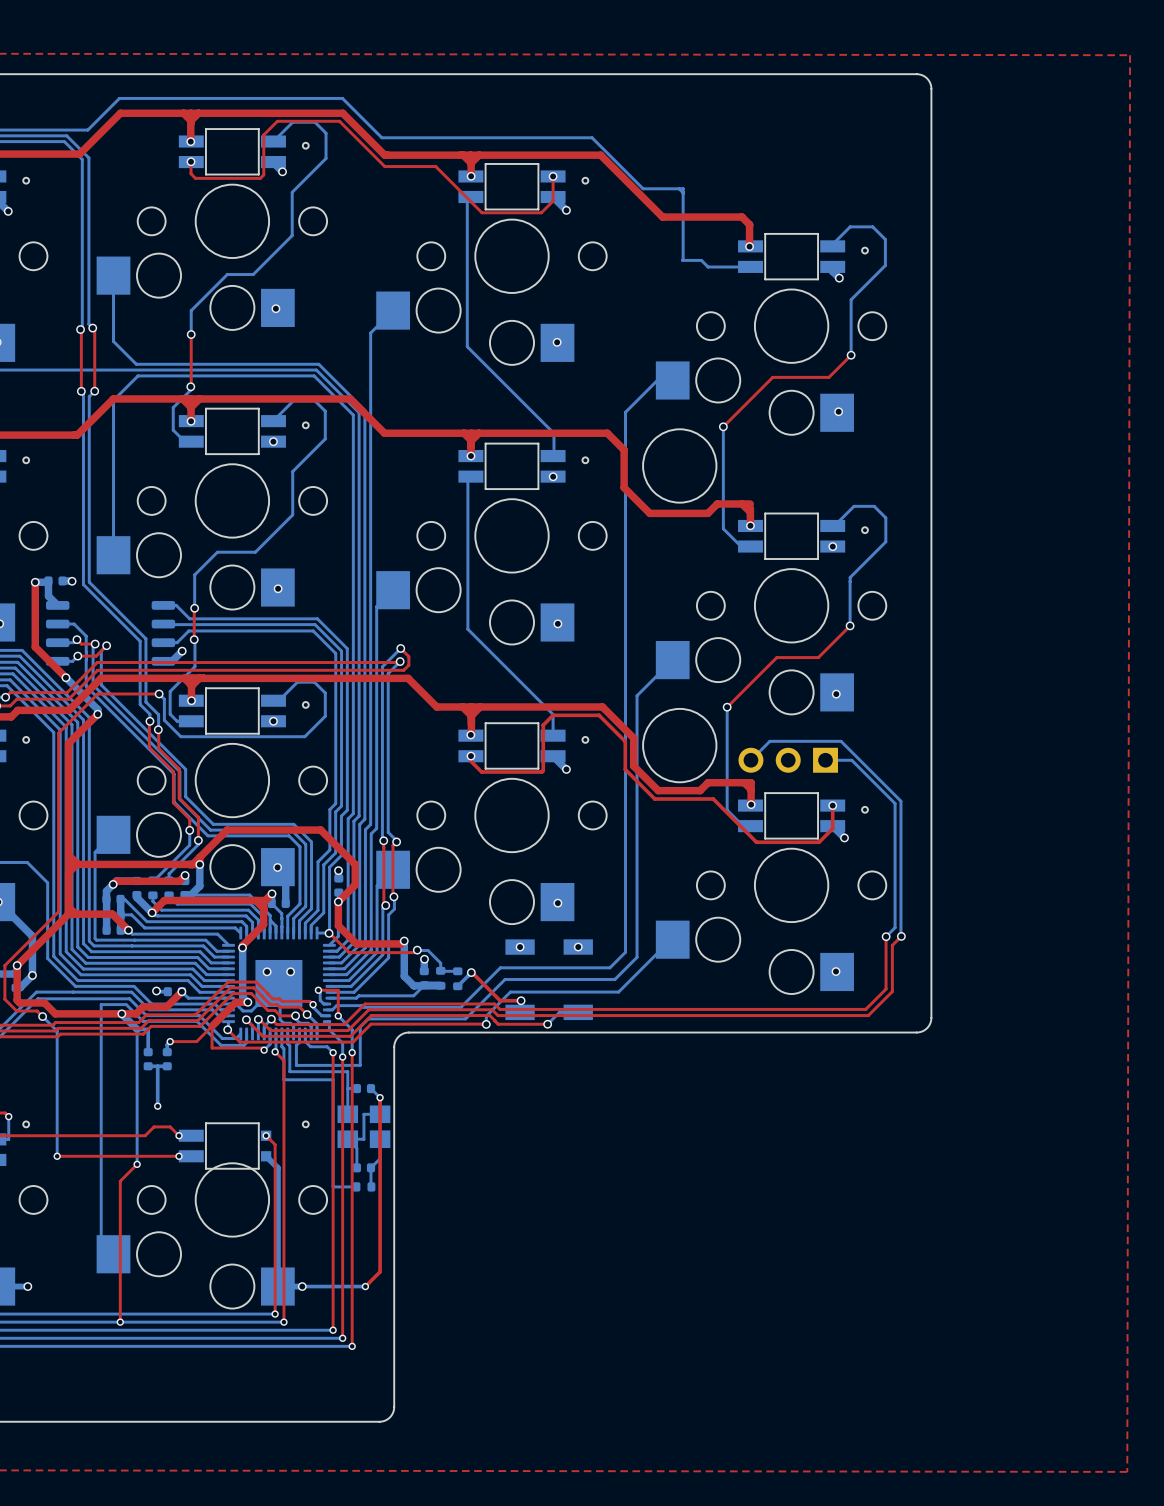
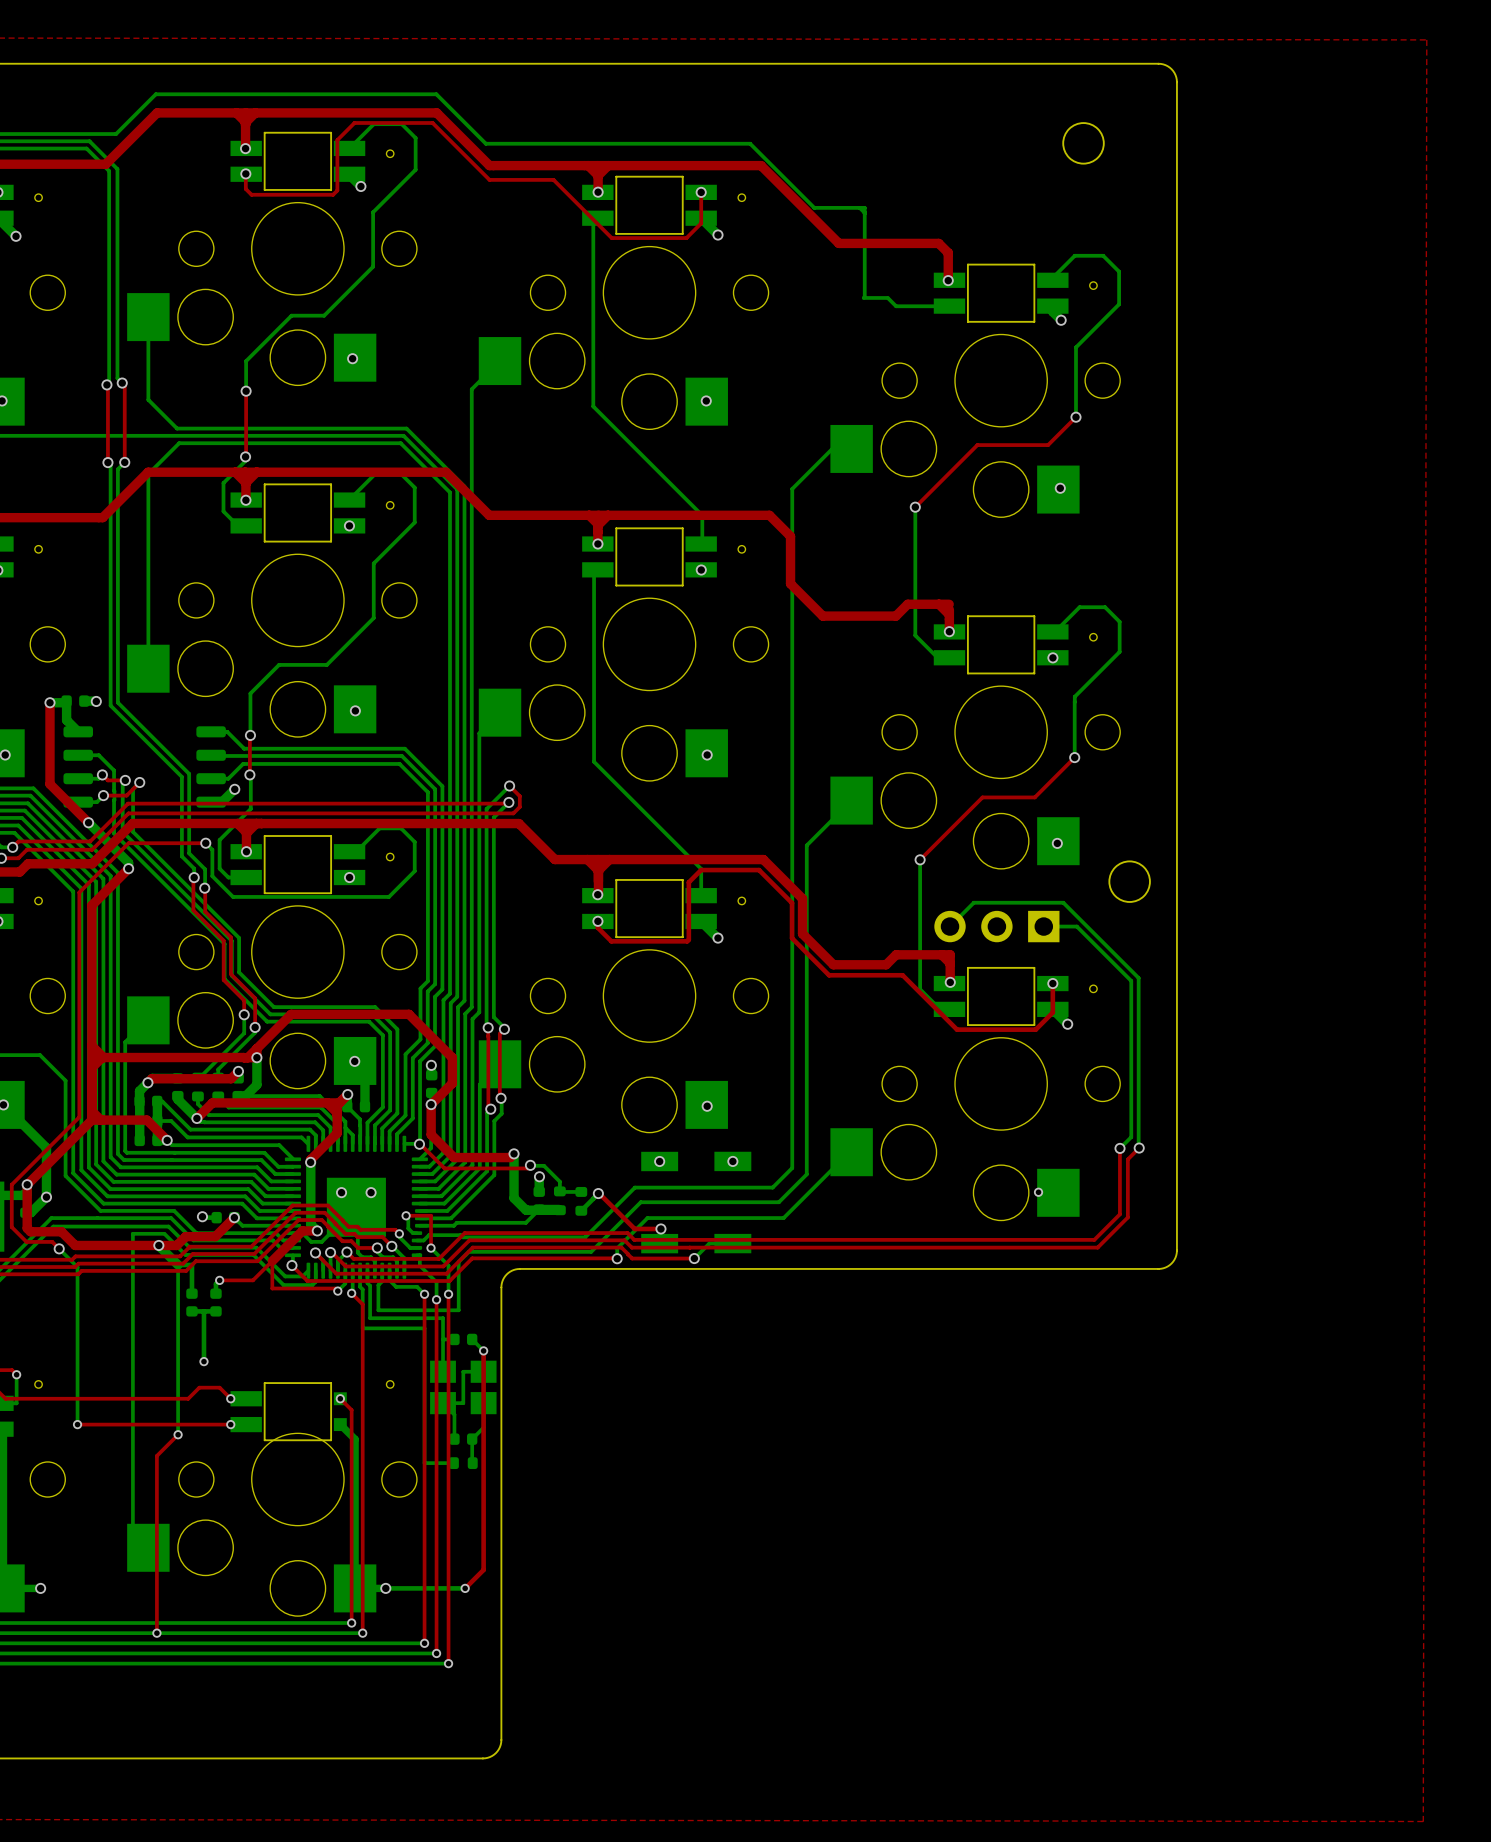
round board edge: none -> [1062, 122, 1105, 165]
round board edge: [642, 428, 718, 504] -> none
round board edge: none -> [1108, 860, 1151, 903]
round board edge: [642, 708, 718, 784] -> none
via: none -> (1038, 1192)
via: (836, 971) -> none

